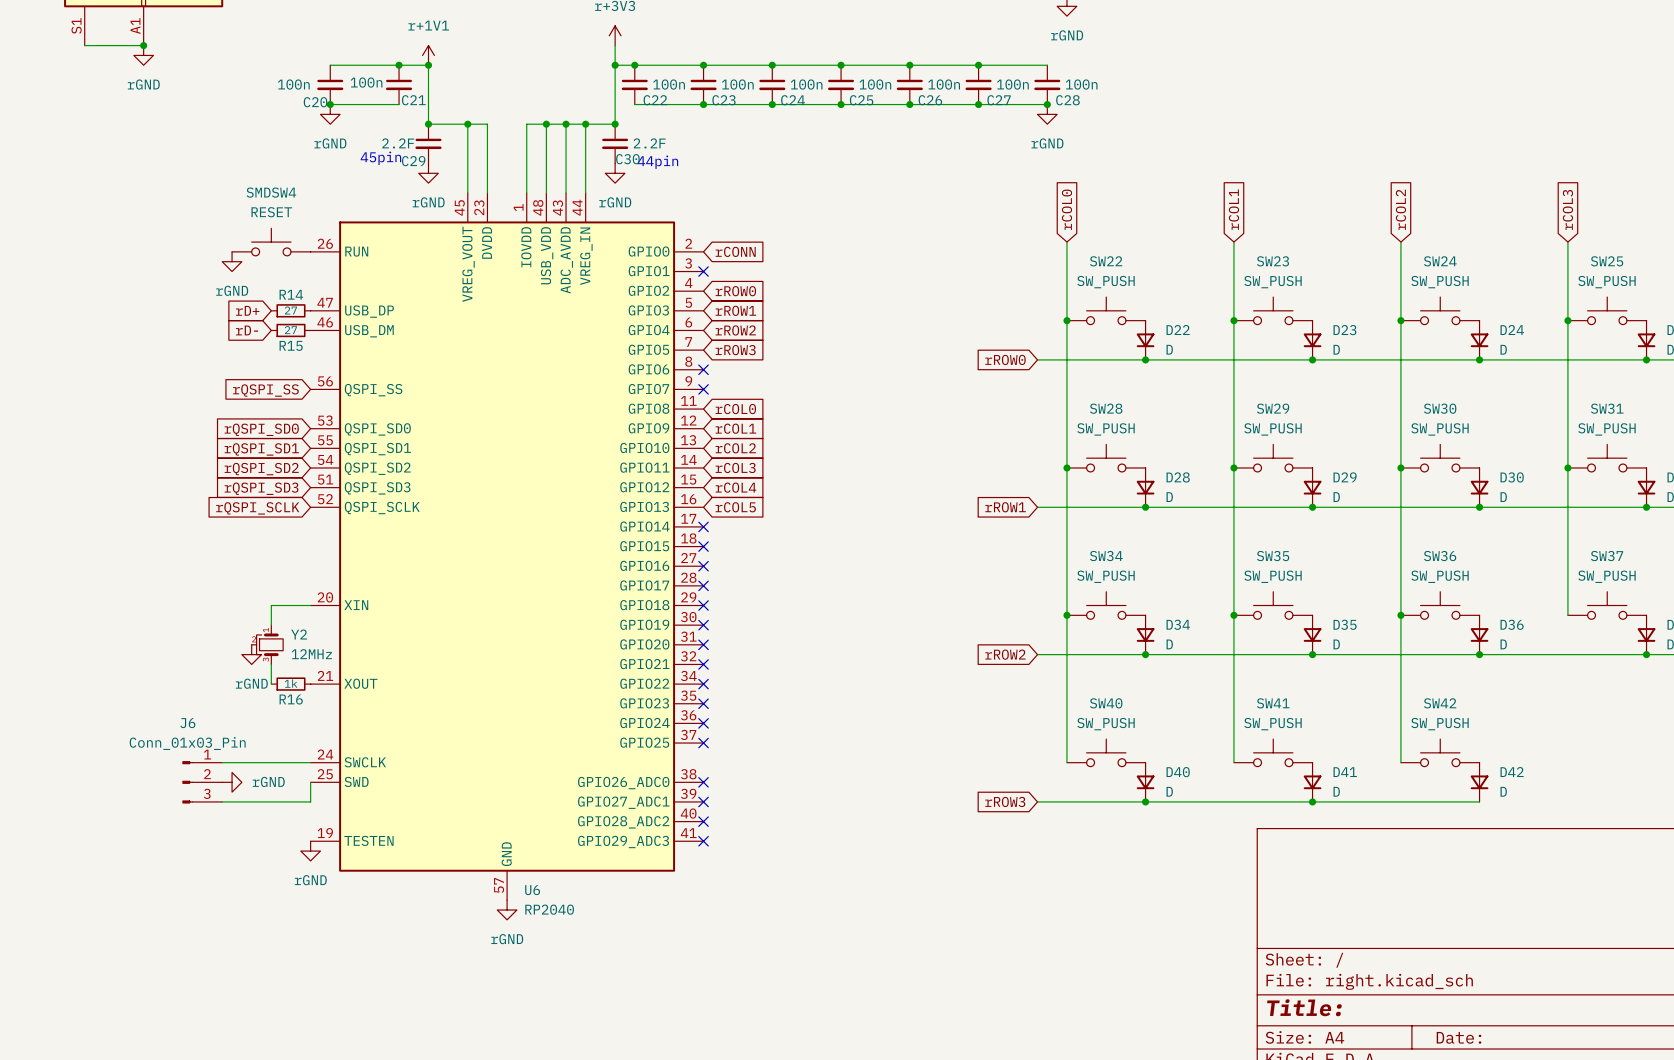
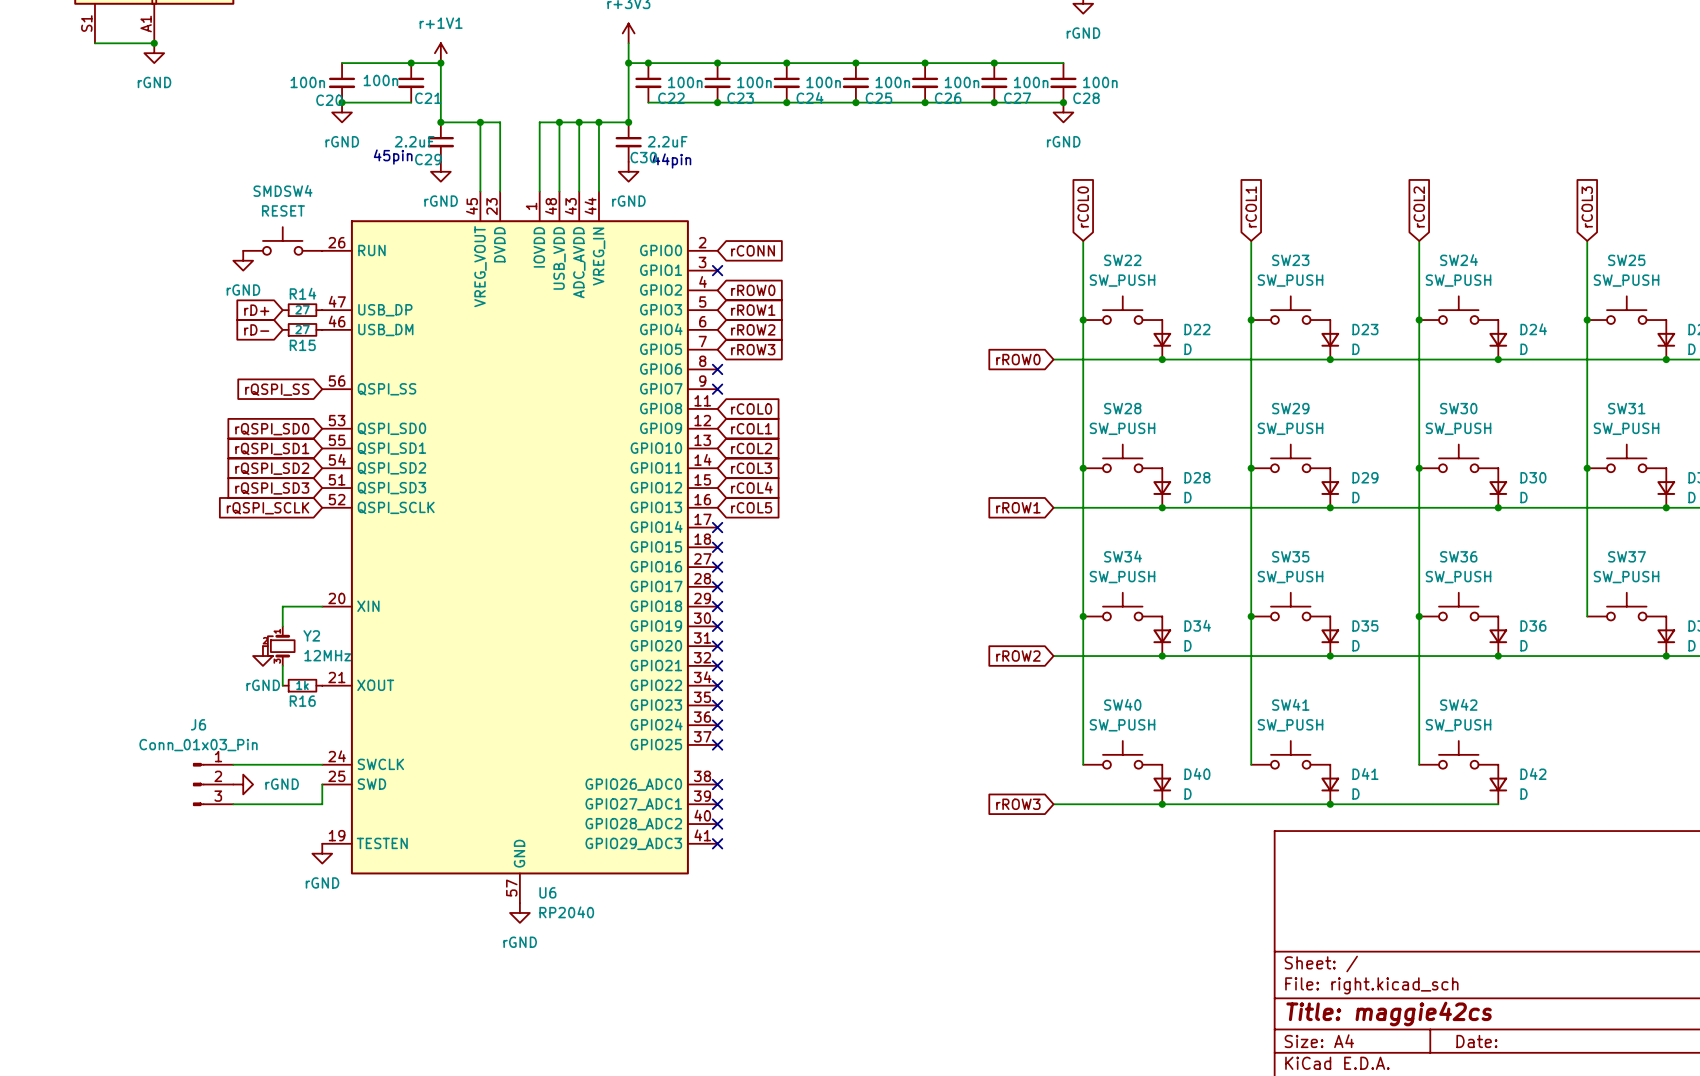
C29 value: 2.2F (398, 143) -> 2.2uF (414, 141)
C30 value: 2.2F (649, 143) -> 2.2uF (667, 141)
title block: Title: (1304, 1007) -> Title: maggie42cs (1389, 1013)

